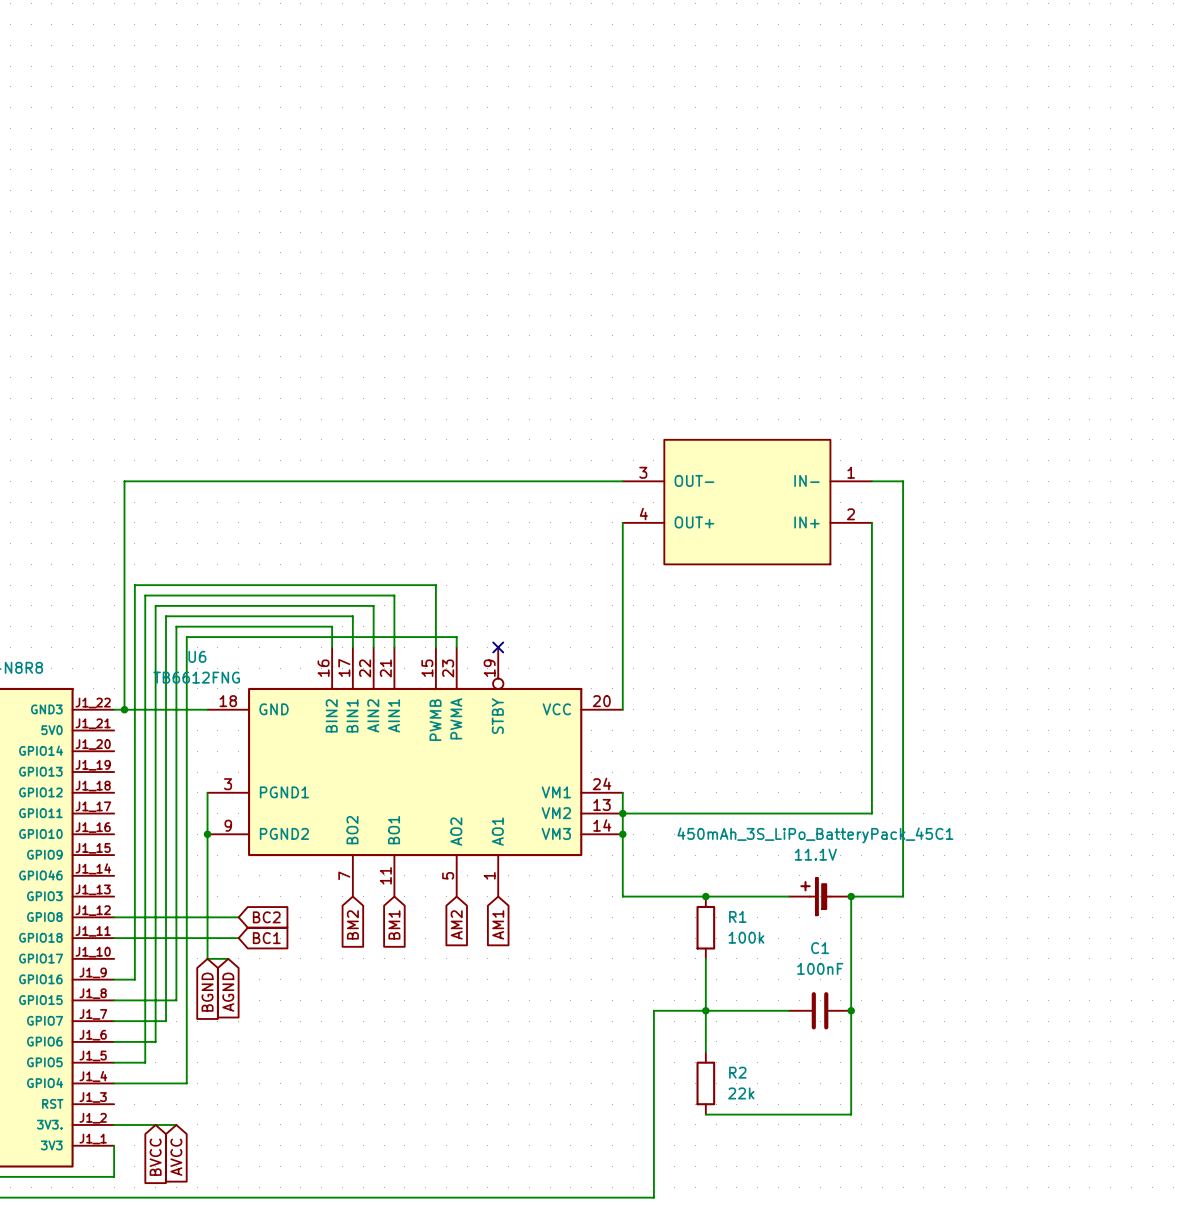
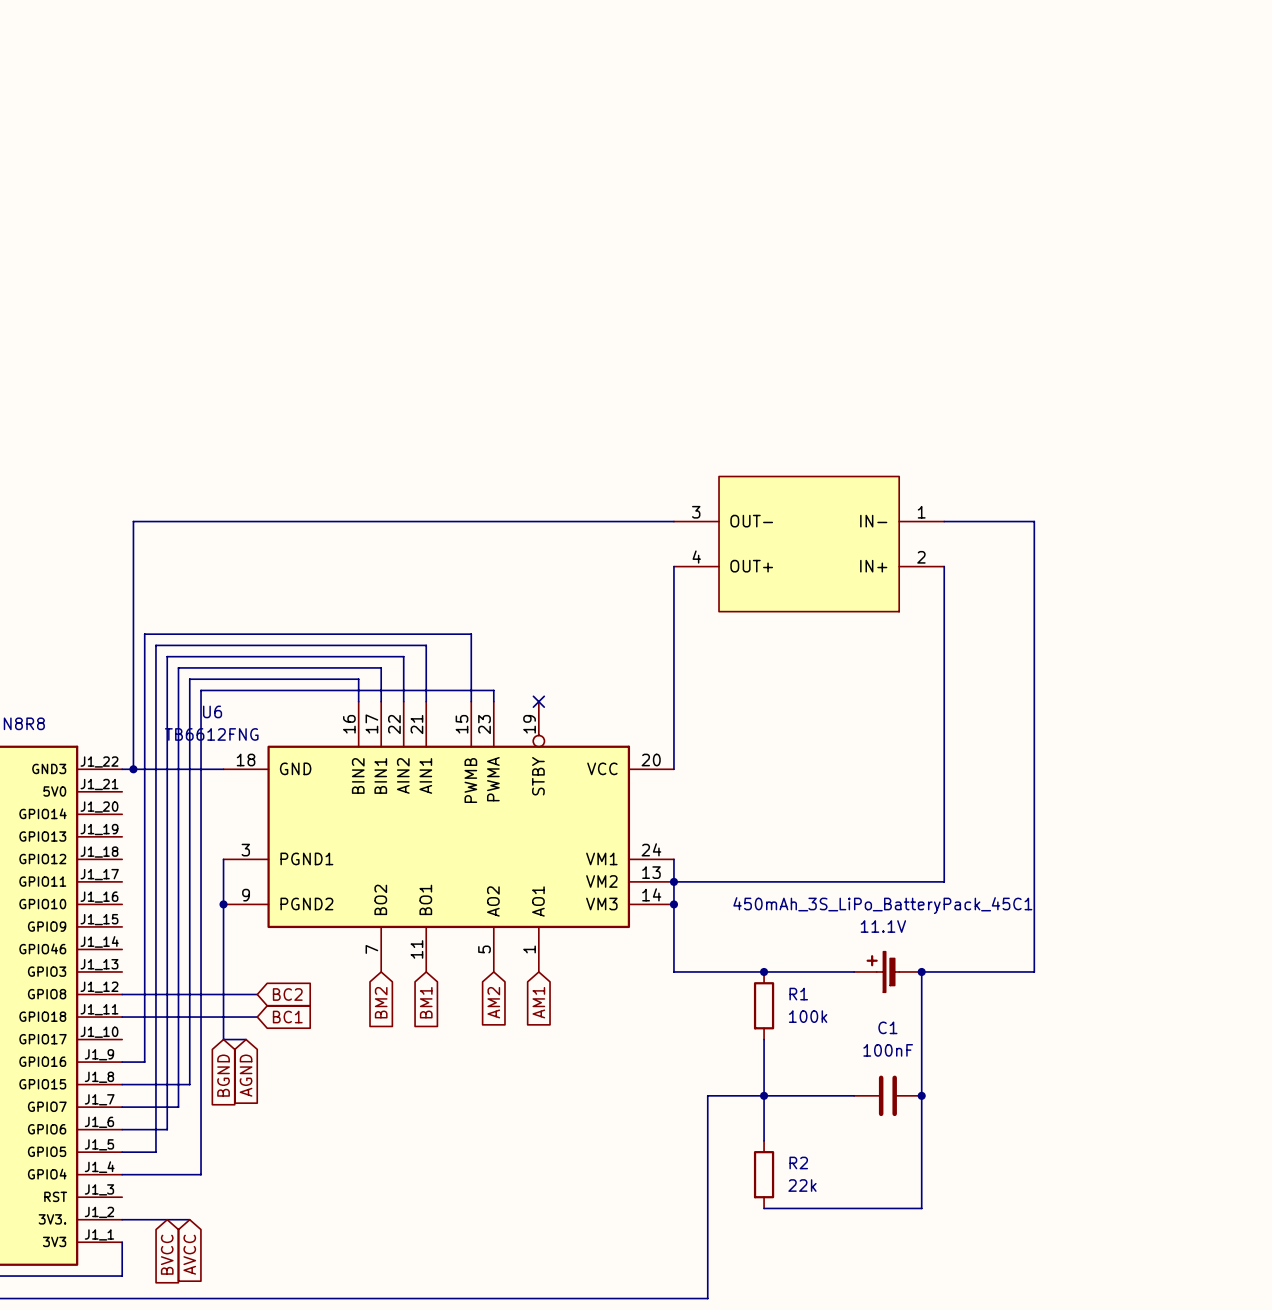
wire: (903, 481) (903, 896) -> (978, 521) (1034, 521) (1034, 971) (978, 971)

